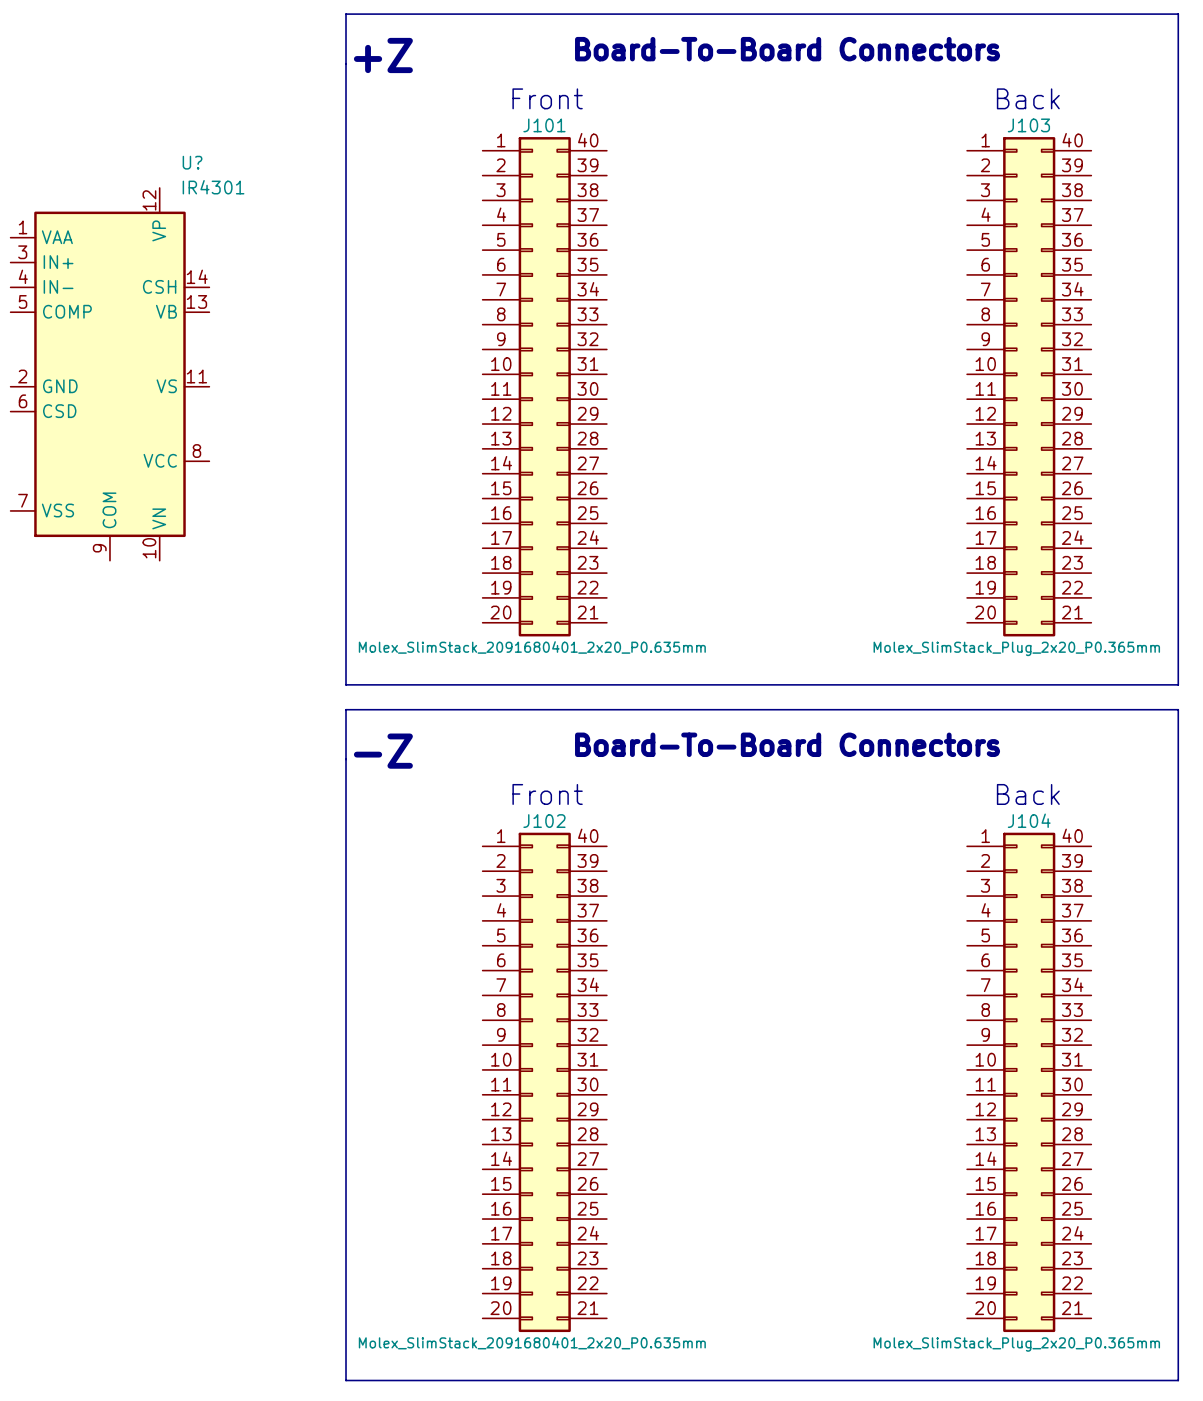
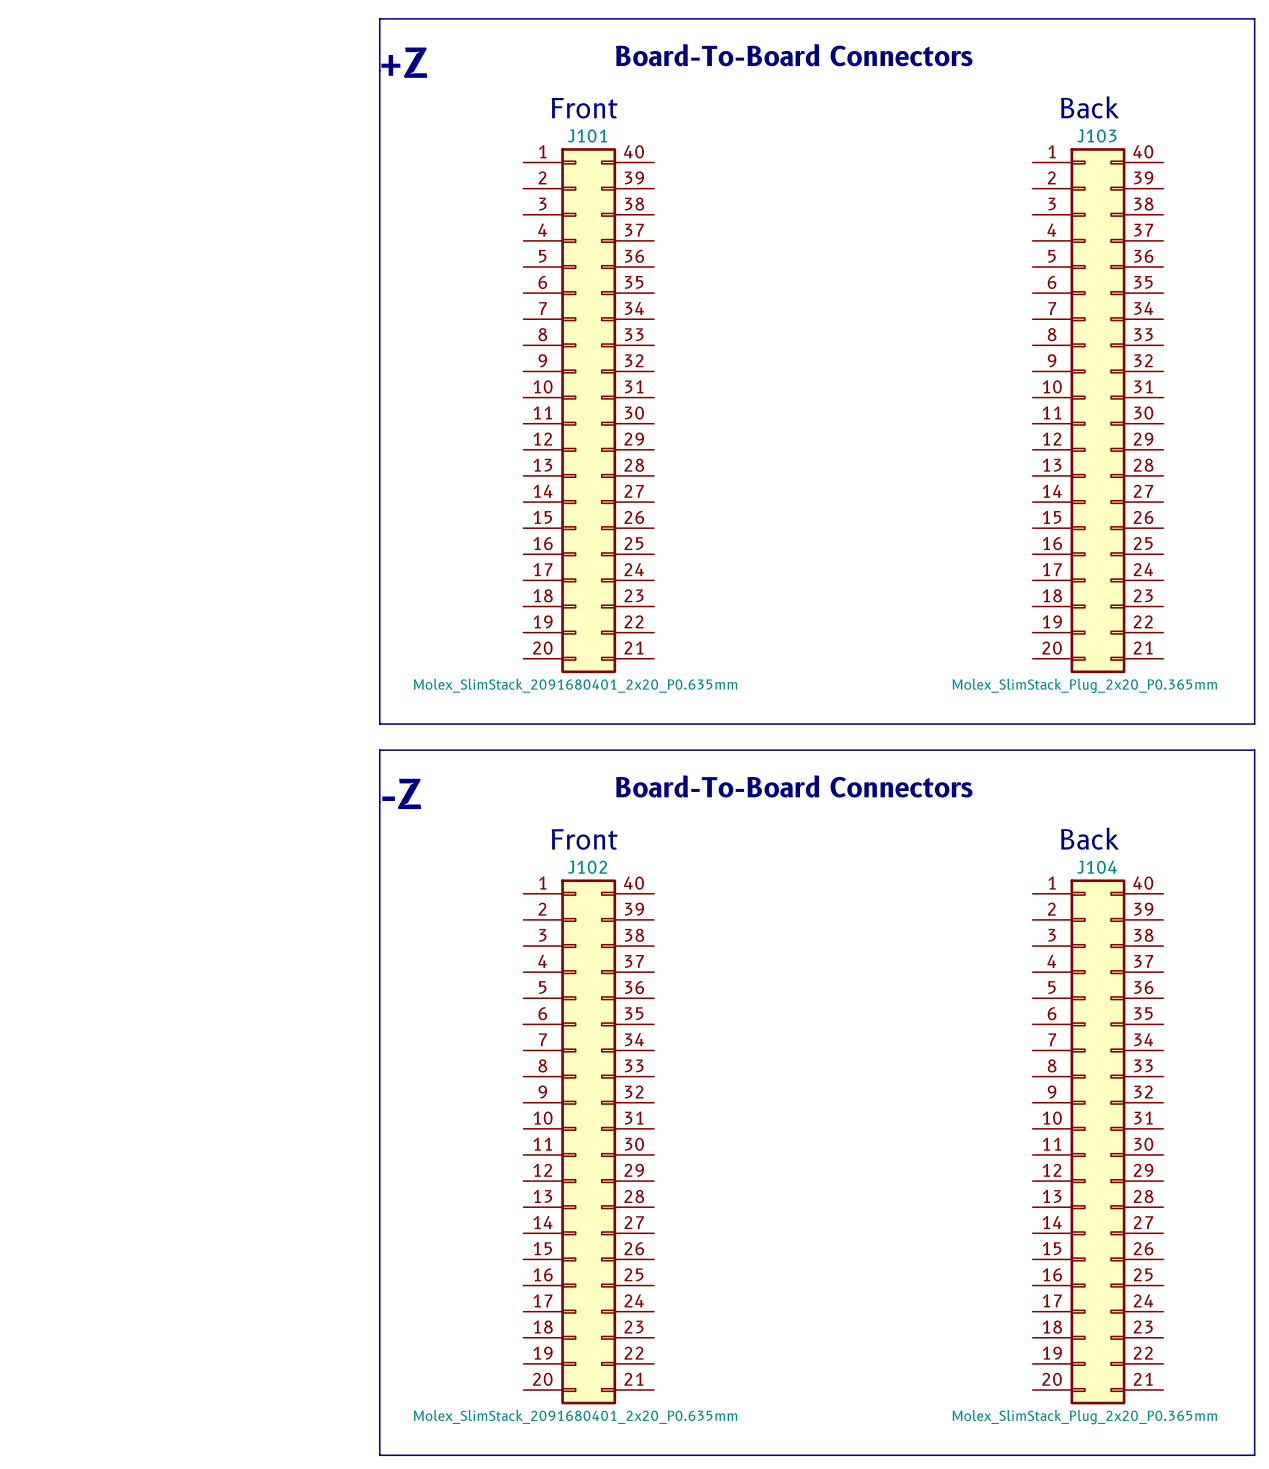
U?: IR4301 (109, 374) -> none

